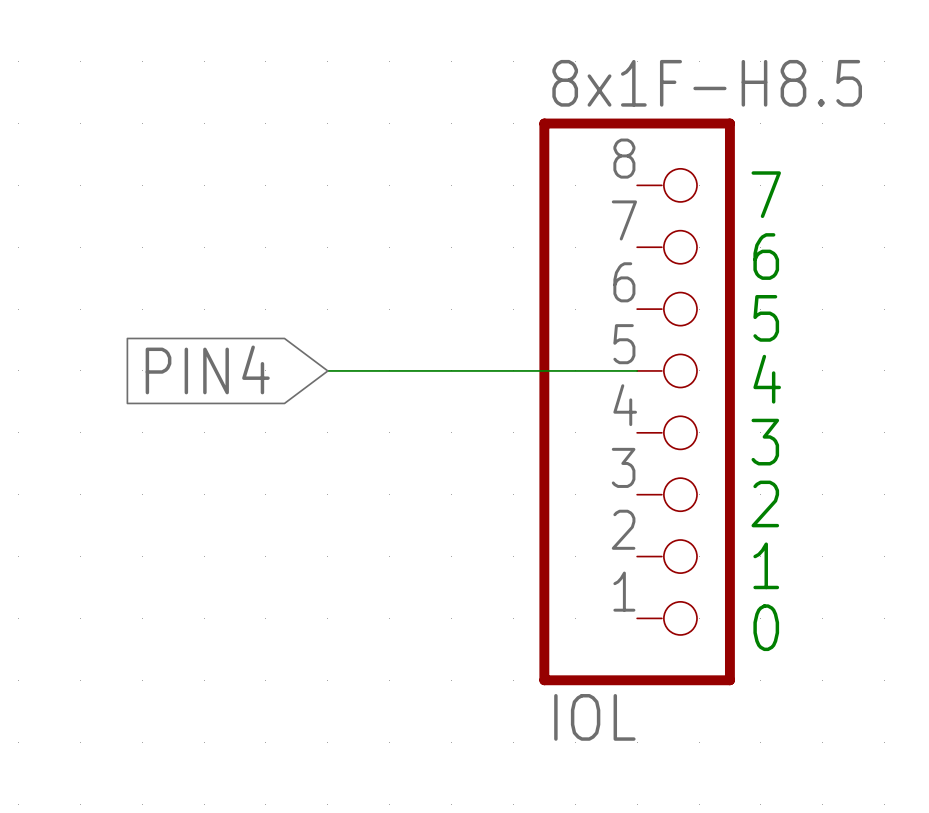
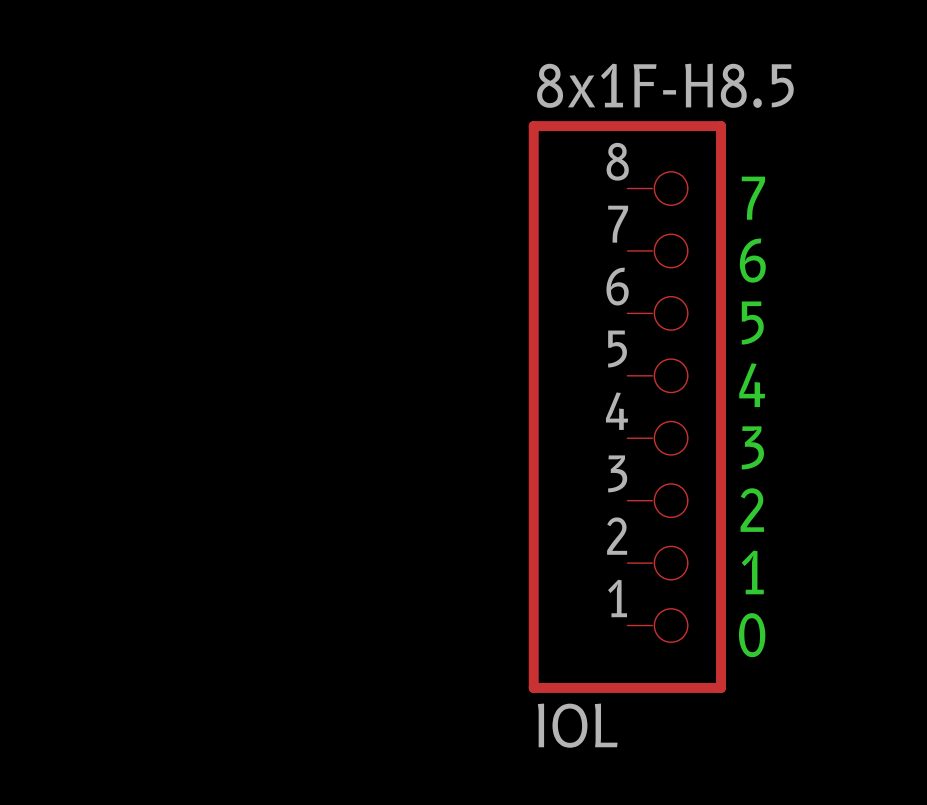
global label: PIN4 (207, 369) -> none
wire: (327, 370) (637, 370) -> none

